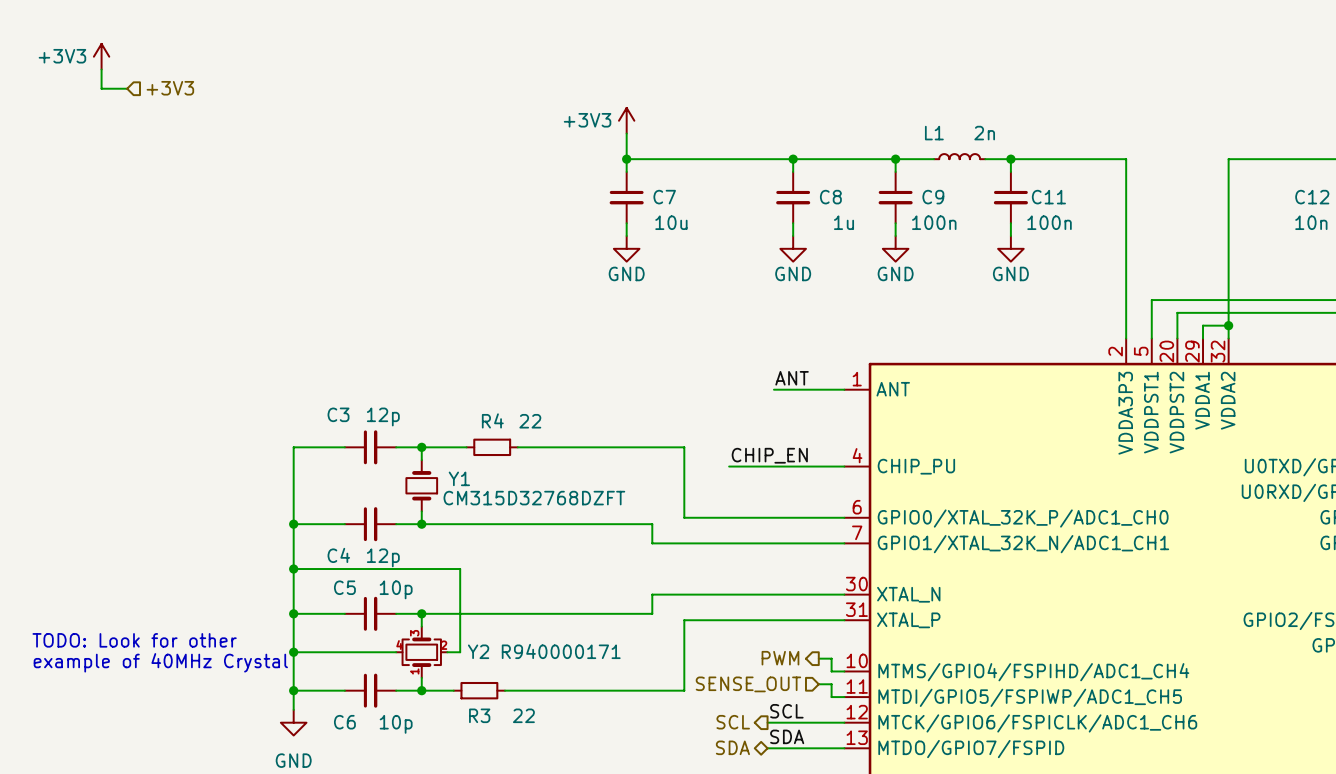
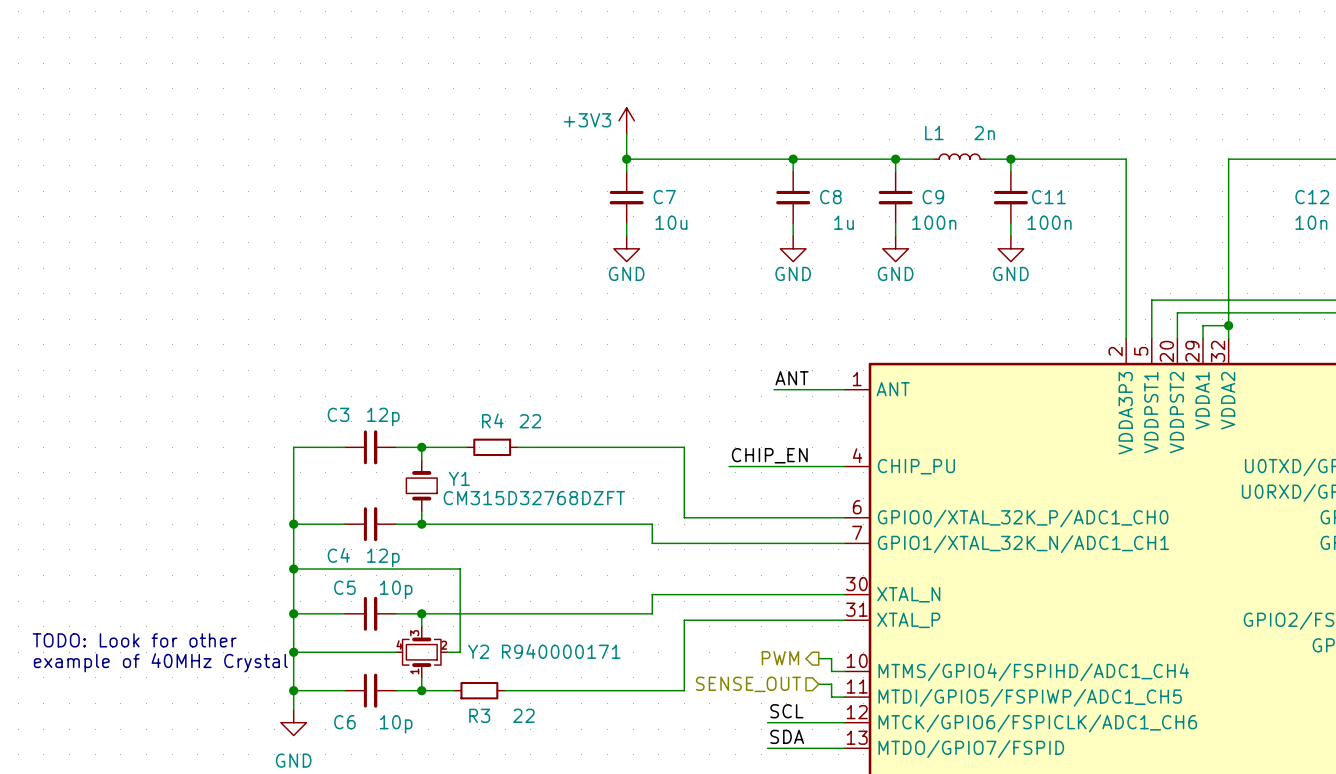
power symbol: +3V3 (101, 56) -> none
wire: (101, 69) (101, 88) (127, 88) -> none
hierarchical label: +3V3 (170, 88) -> none
hierarchical label: SCL (733, 722) -> none
hierarchical label: SDA (732, 747) -> none

